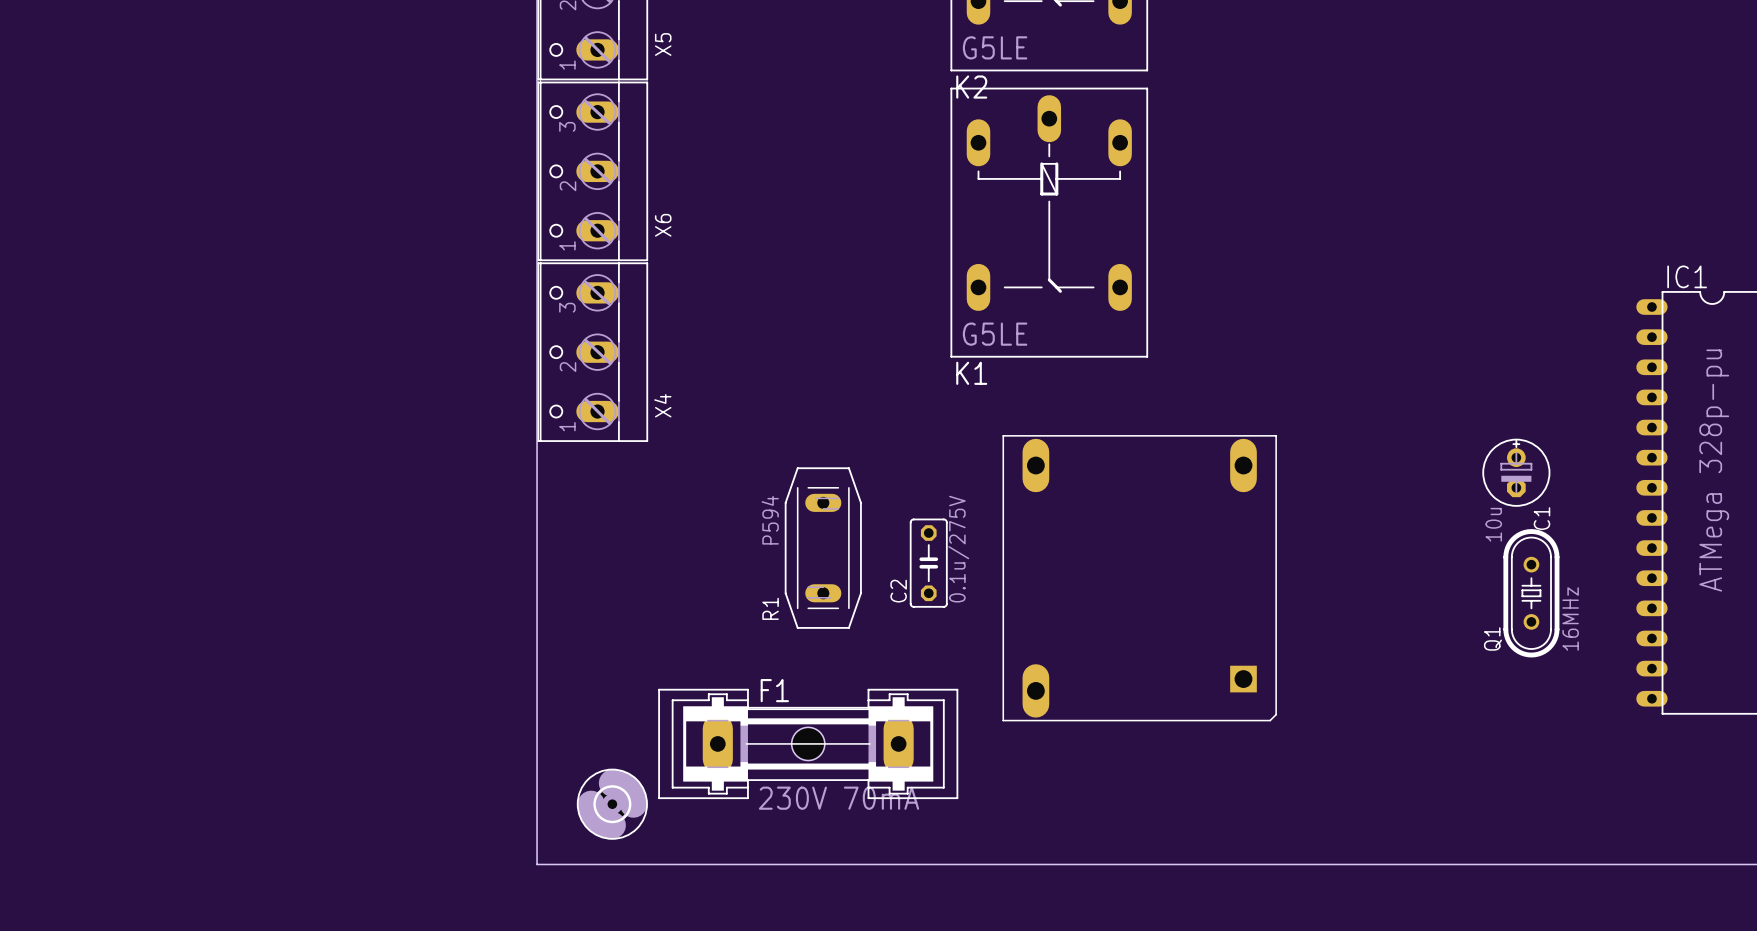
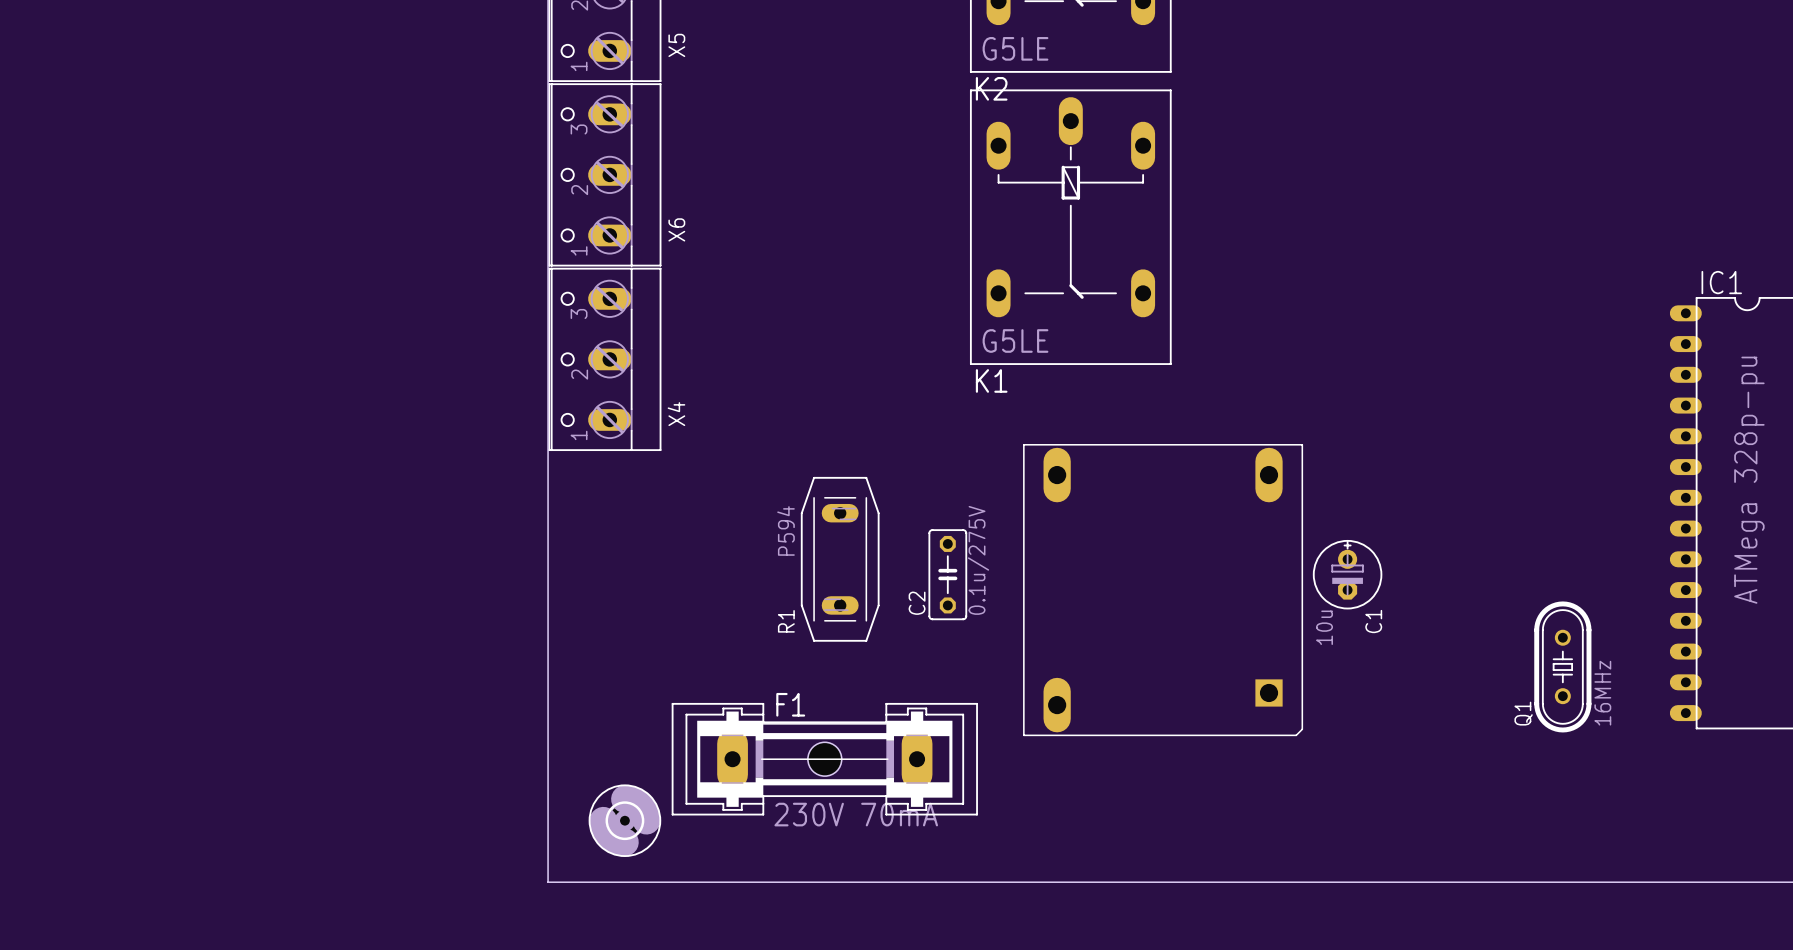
C1 position: (1516, 472) -> (1347, 574)
Q1 position: (1531, 593) -> (1562, 666)

